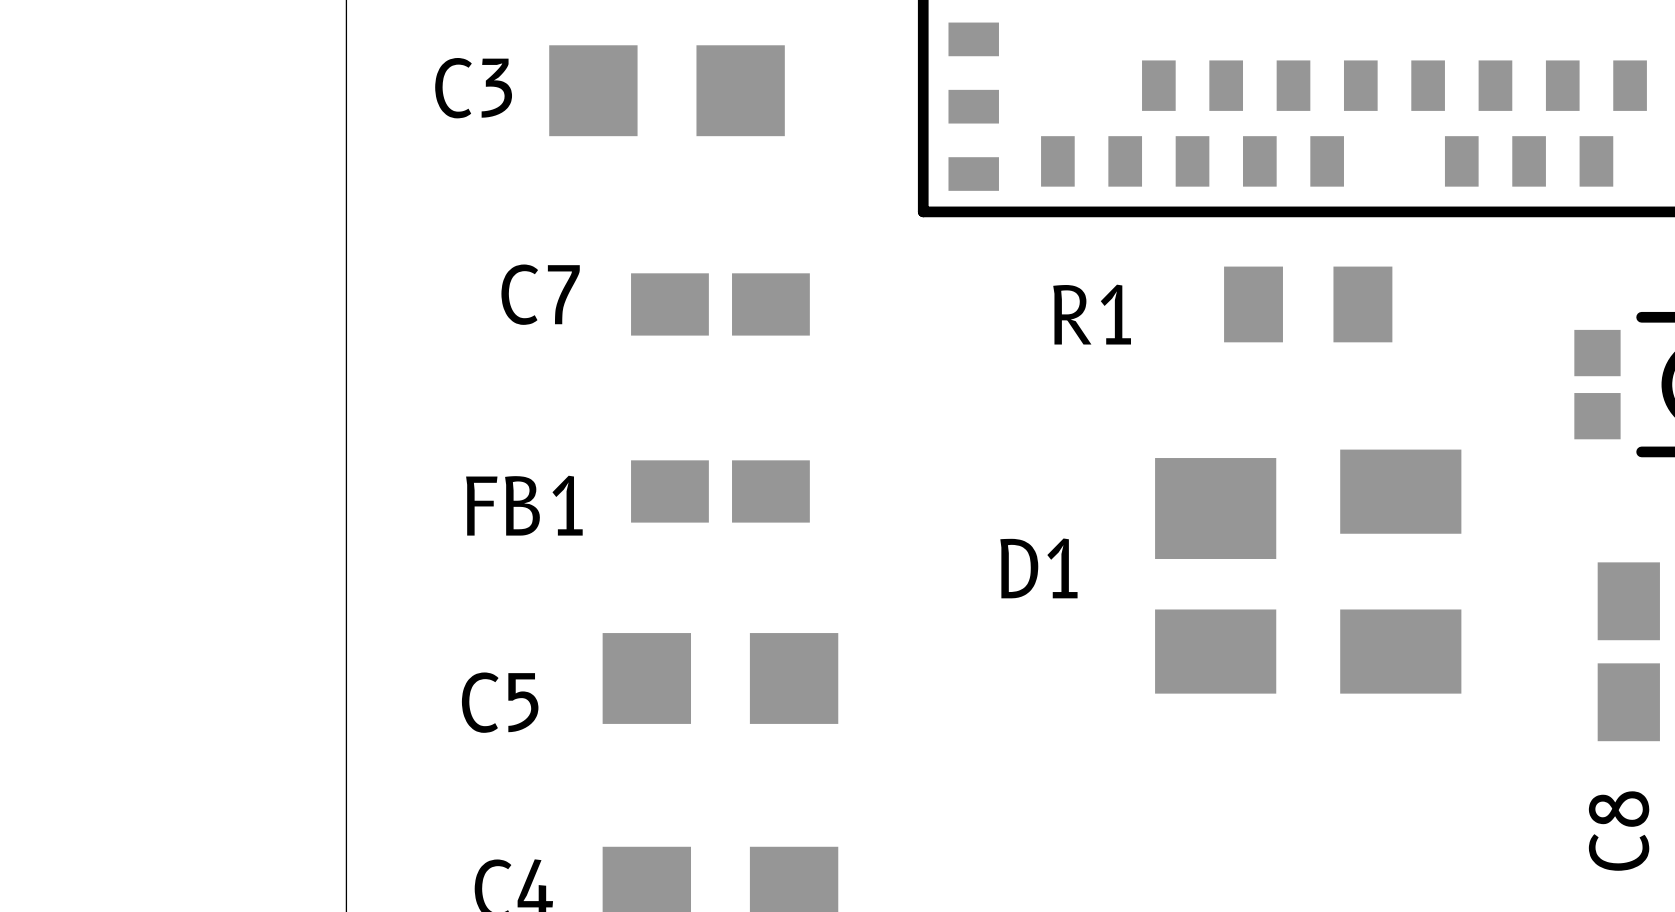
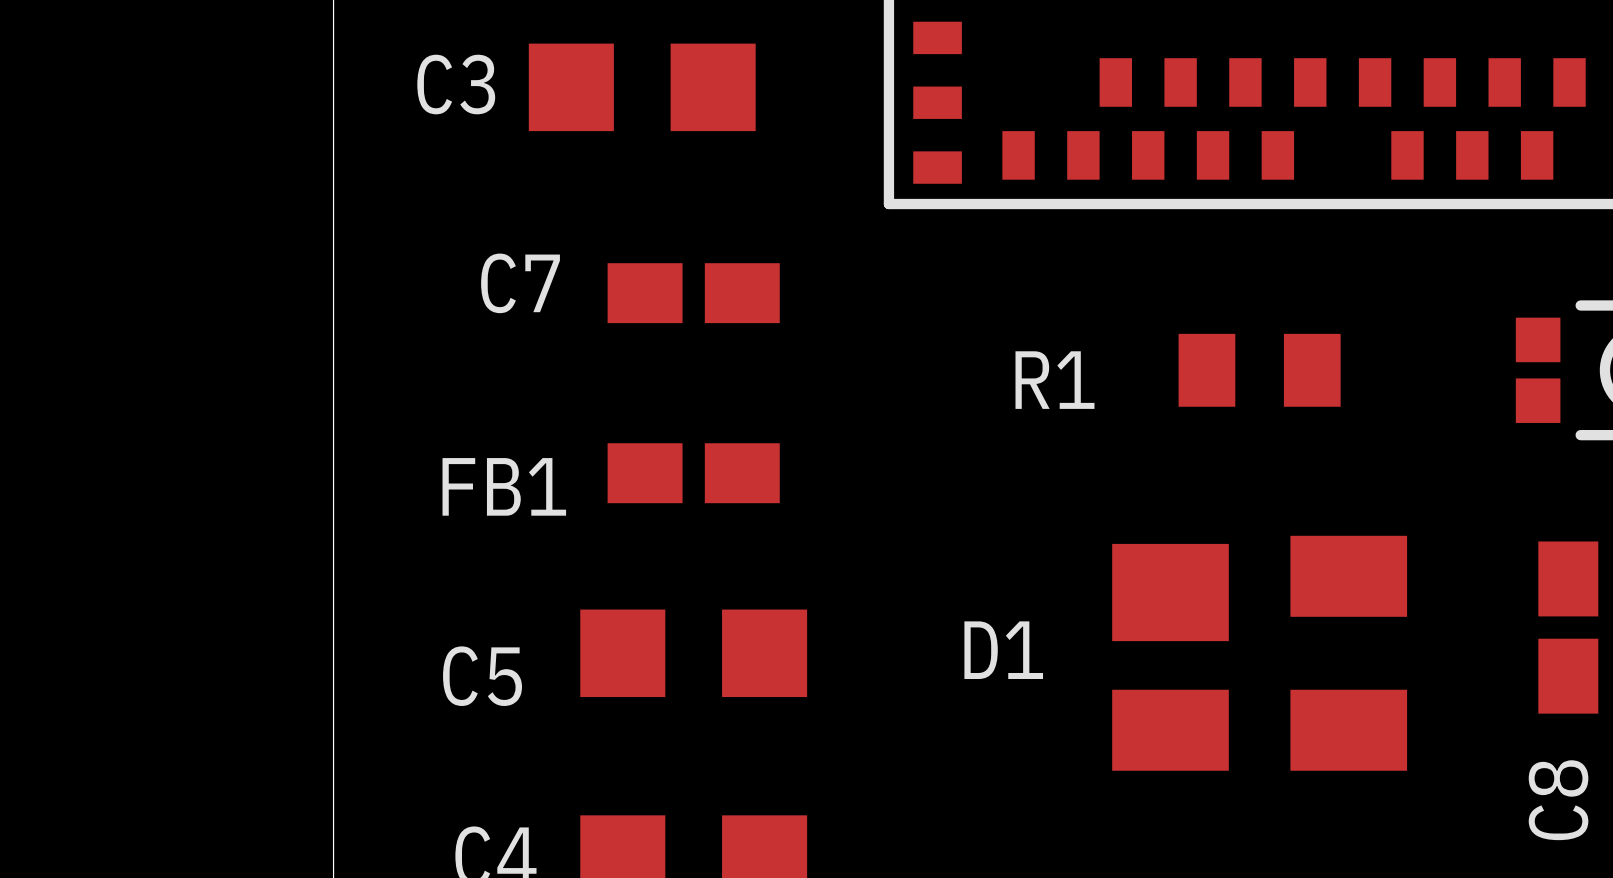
R1 position: (1308, 304) -> (1259, 370)
D1 position: (1308, 571) -> (1259, 653)

